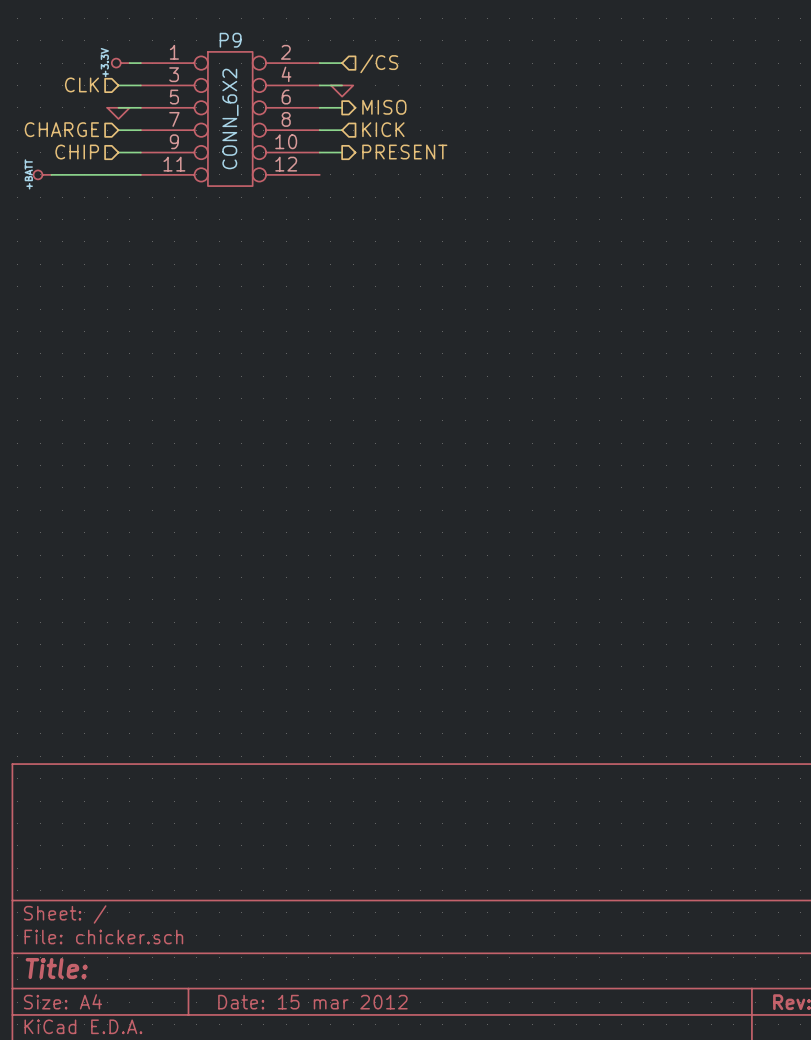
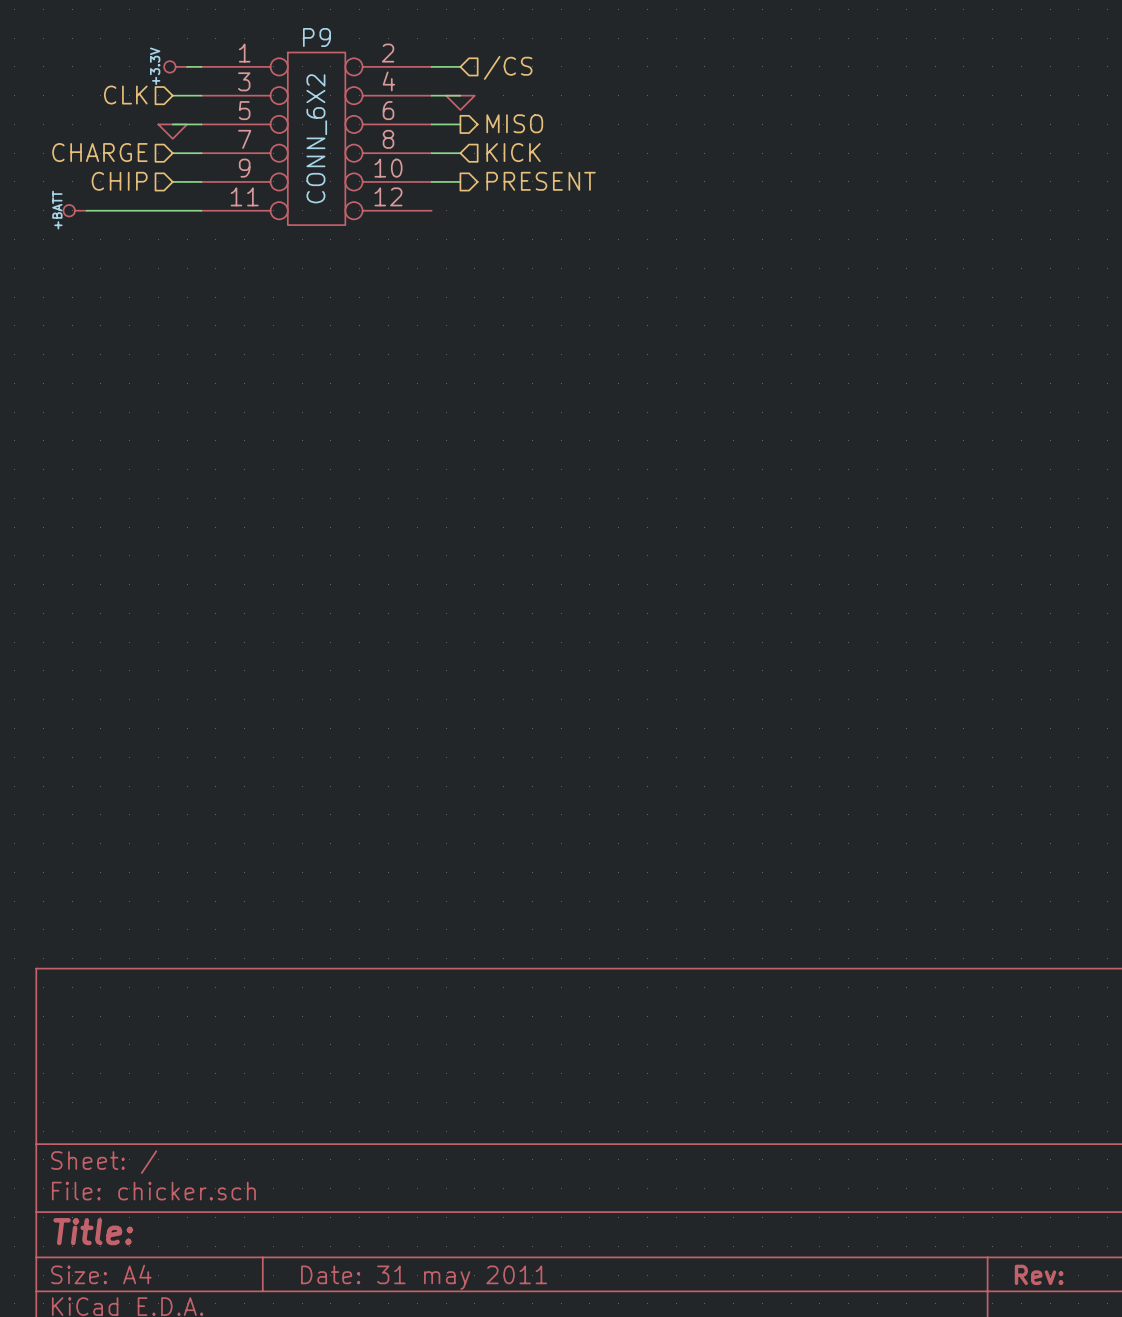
title block: Date: 15 mar 2012 (312, 1002) -> Date: 31 may 2011 (424, 1277)

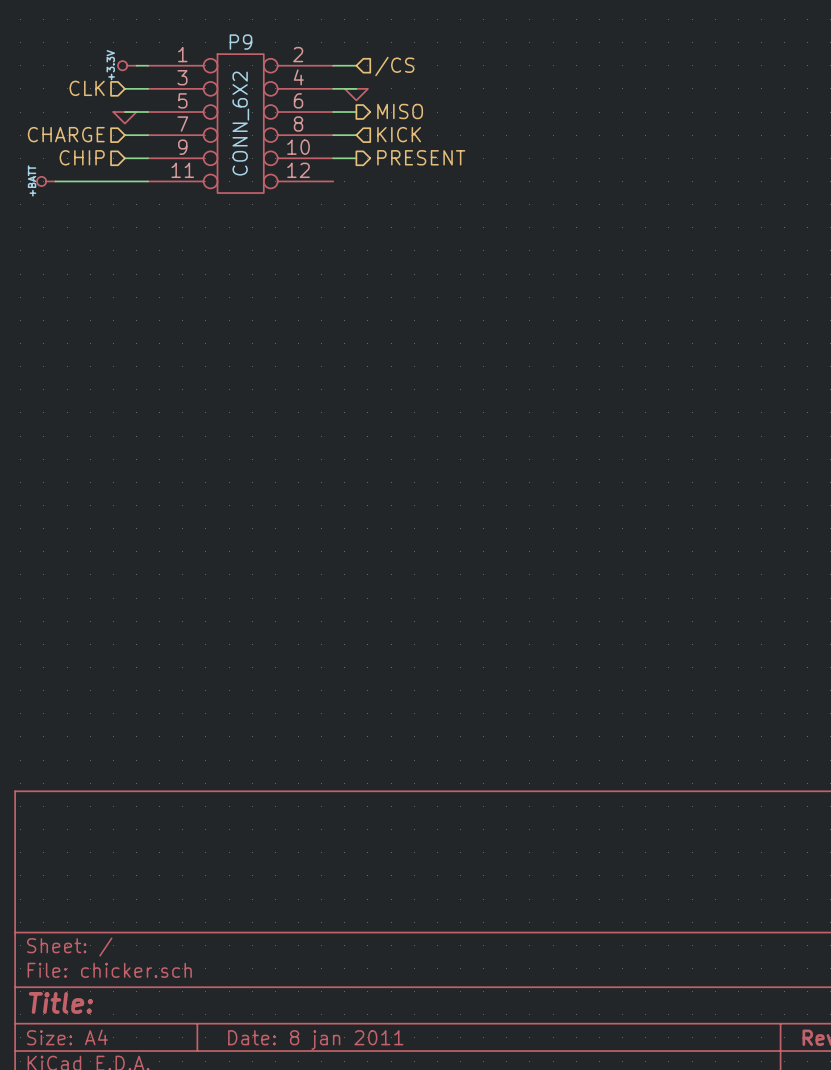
title block: Date: 31 may 2011 (424, 1277) -> Date: 8 jan 2011 (315, 1040)

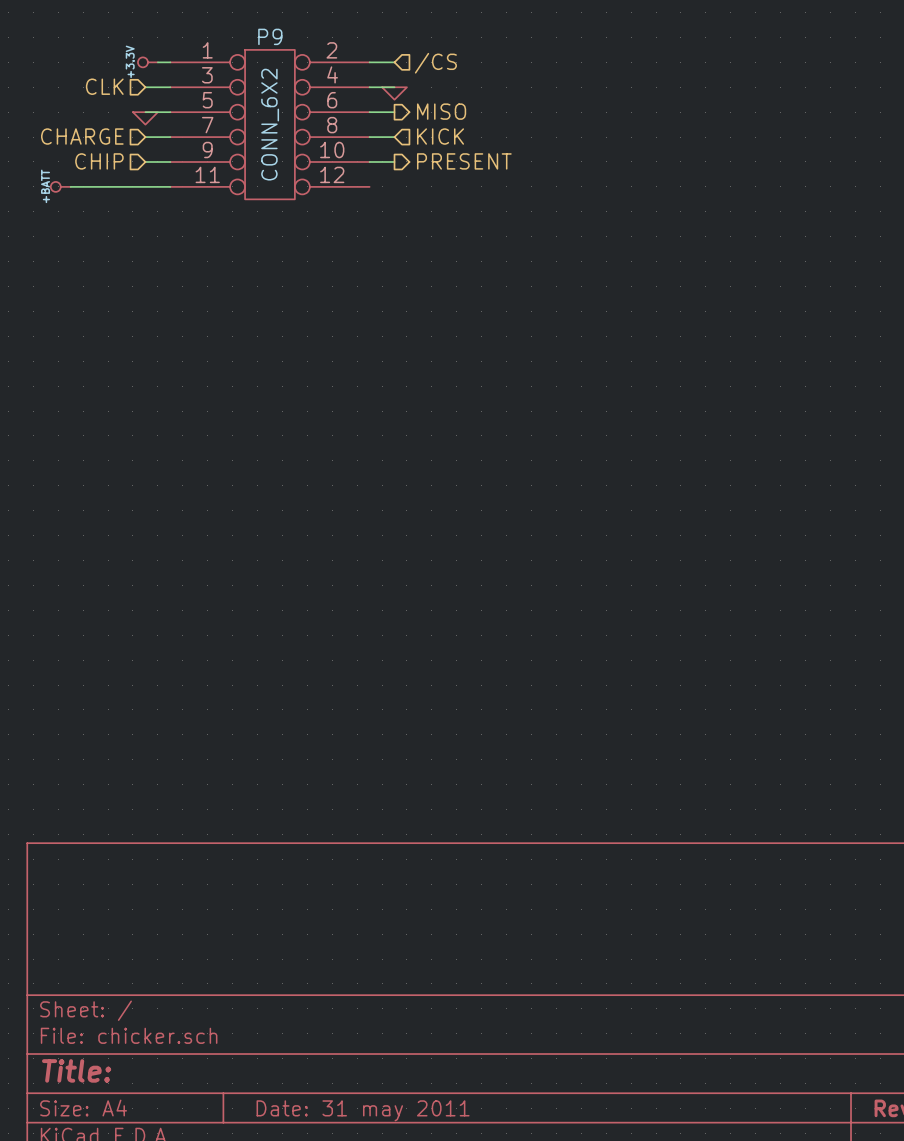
title block: Date: 8 jan 2011 (315, 1040) -> Date: 31 may 2011 (363, 1110)

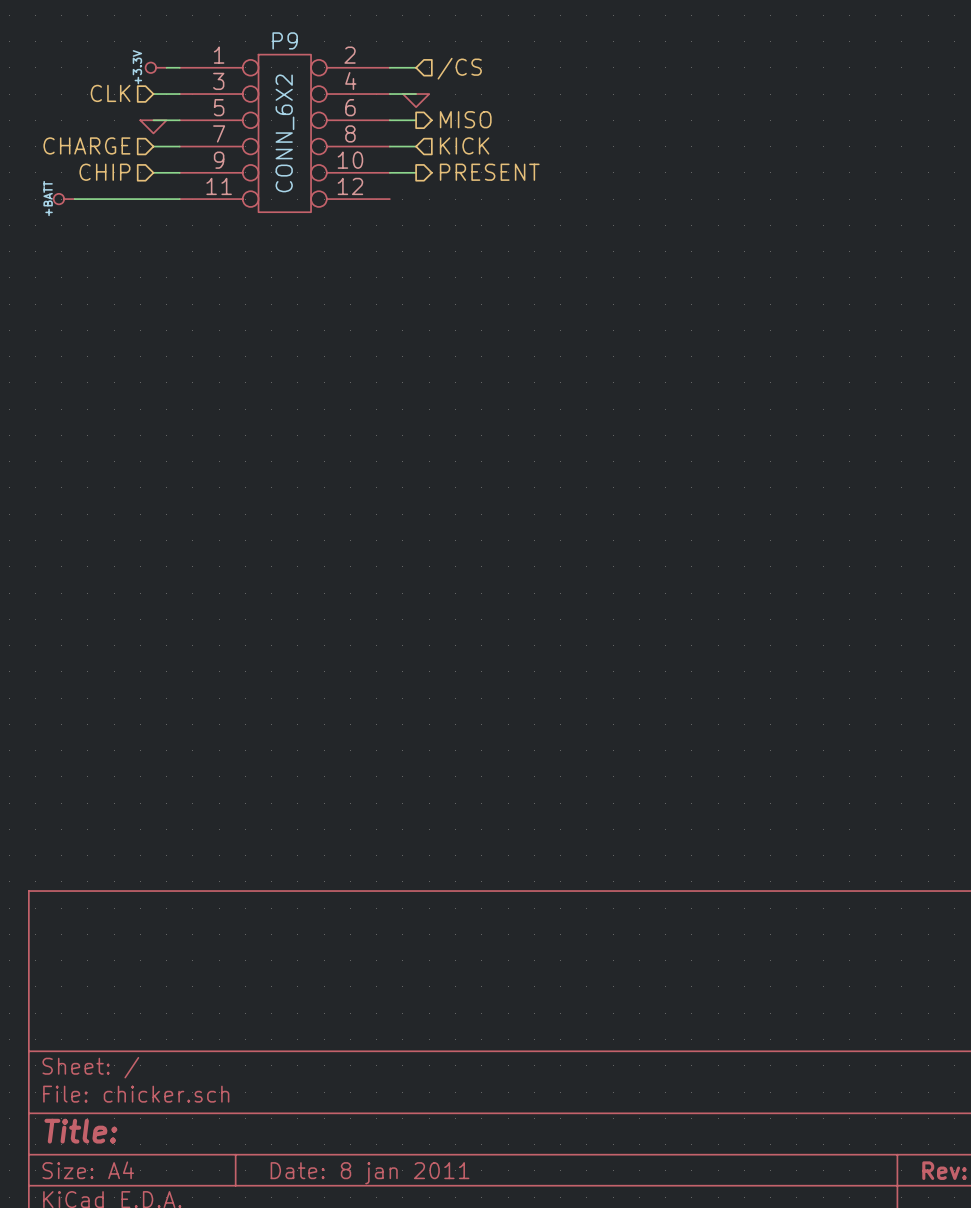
title block: Date: 31 may 2011 (363, 1110) -> Date: 8 jan 2011 (370, 1173)

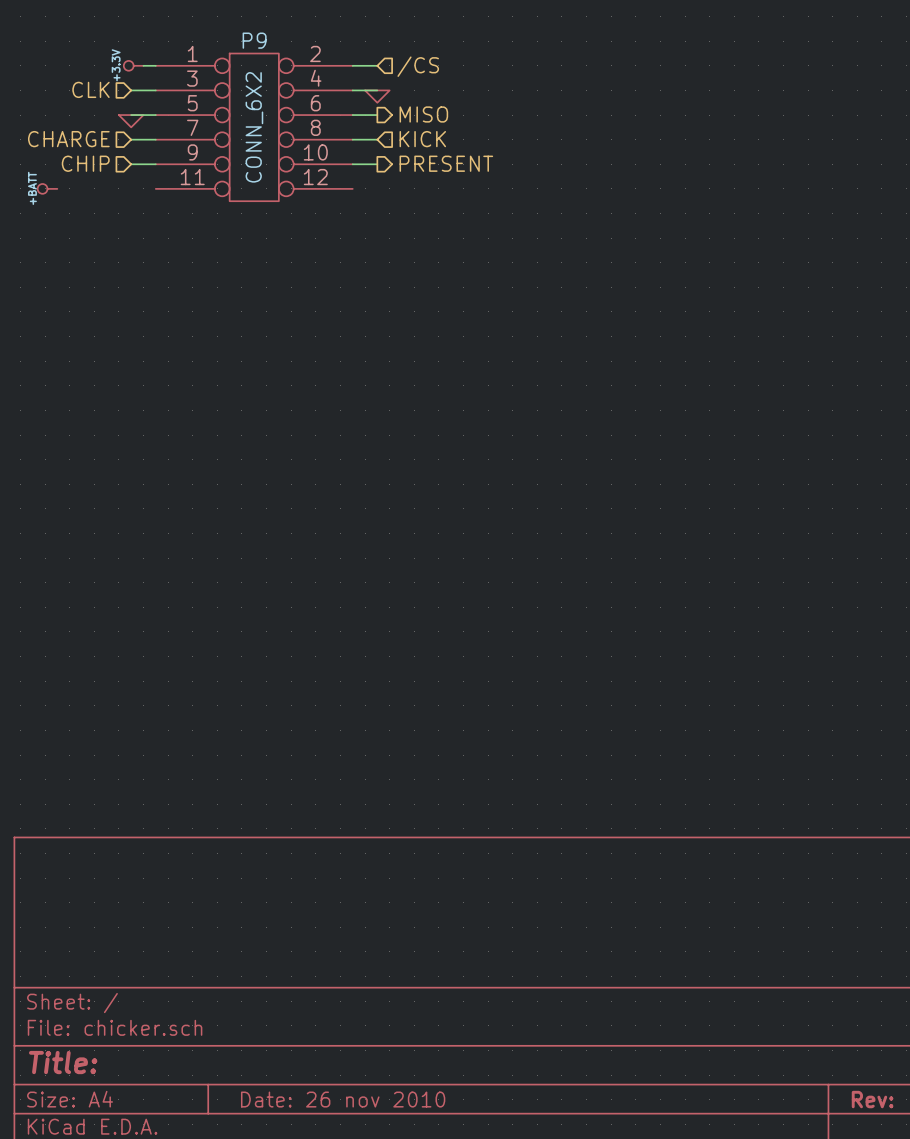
wire: (74, 199) (179, 199) -> none
title block: Date: 8 jan 2011 (370, 1173) -> Date: 26 nov 2010 (343, 1099)

